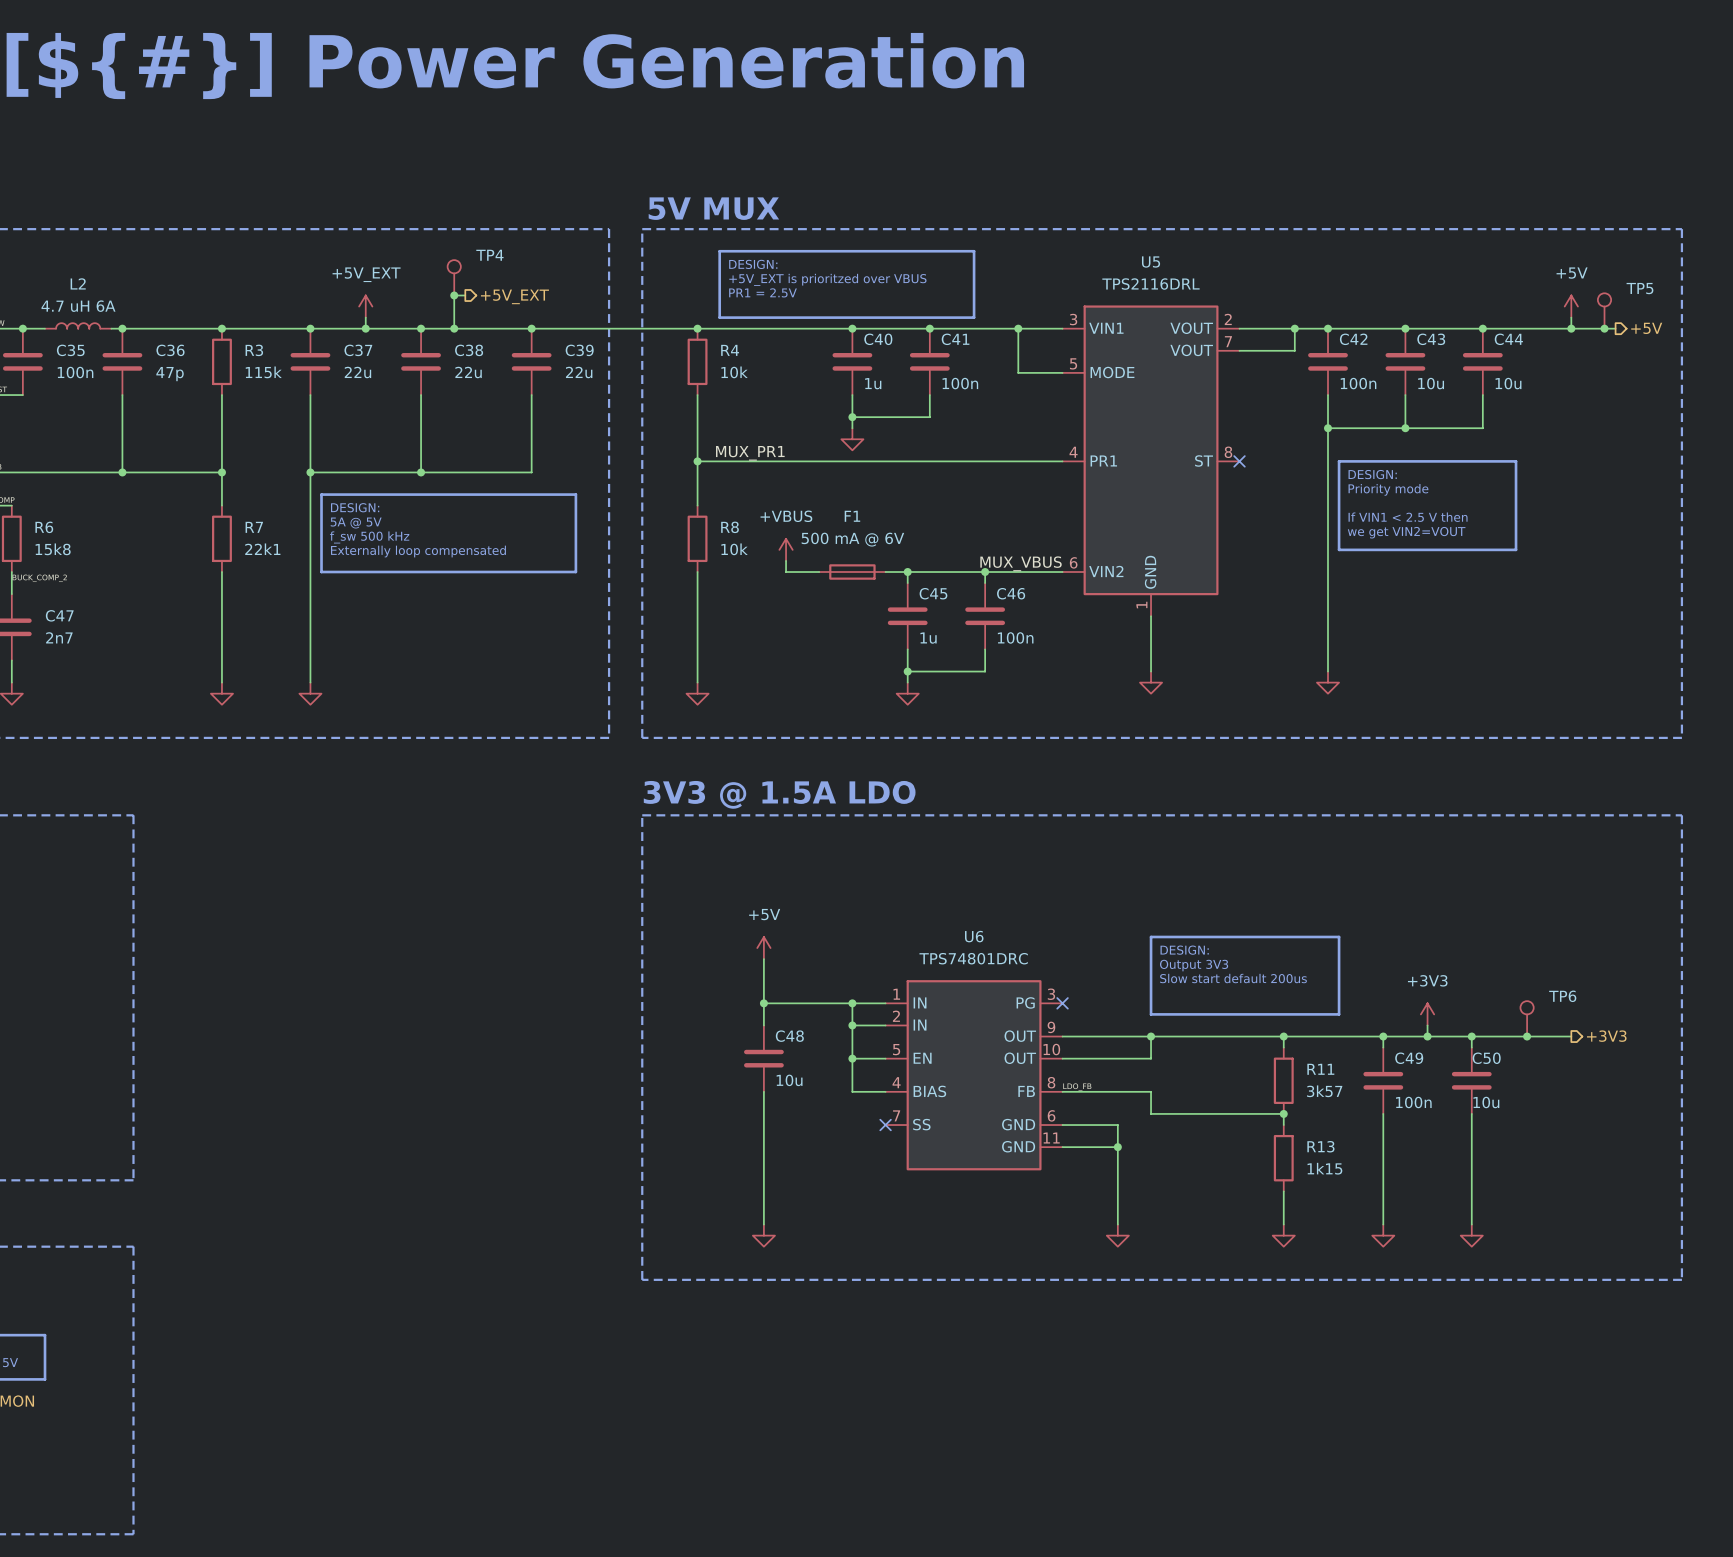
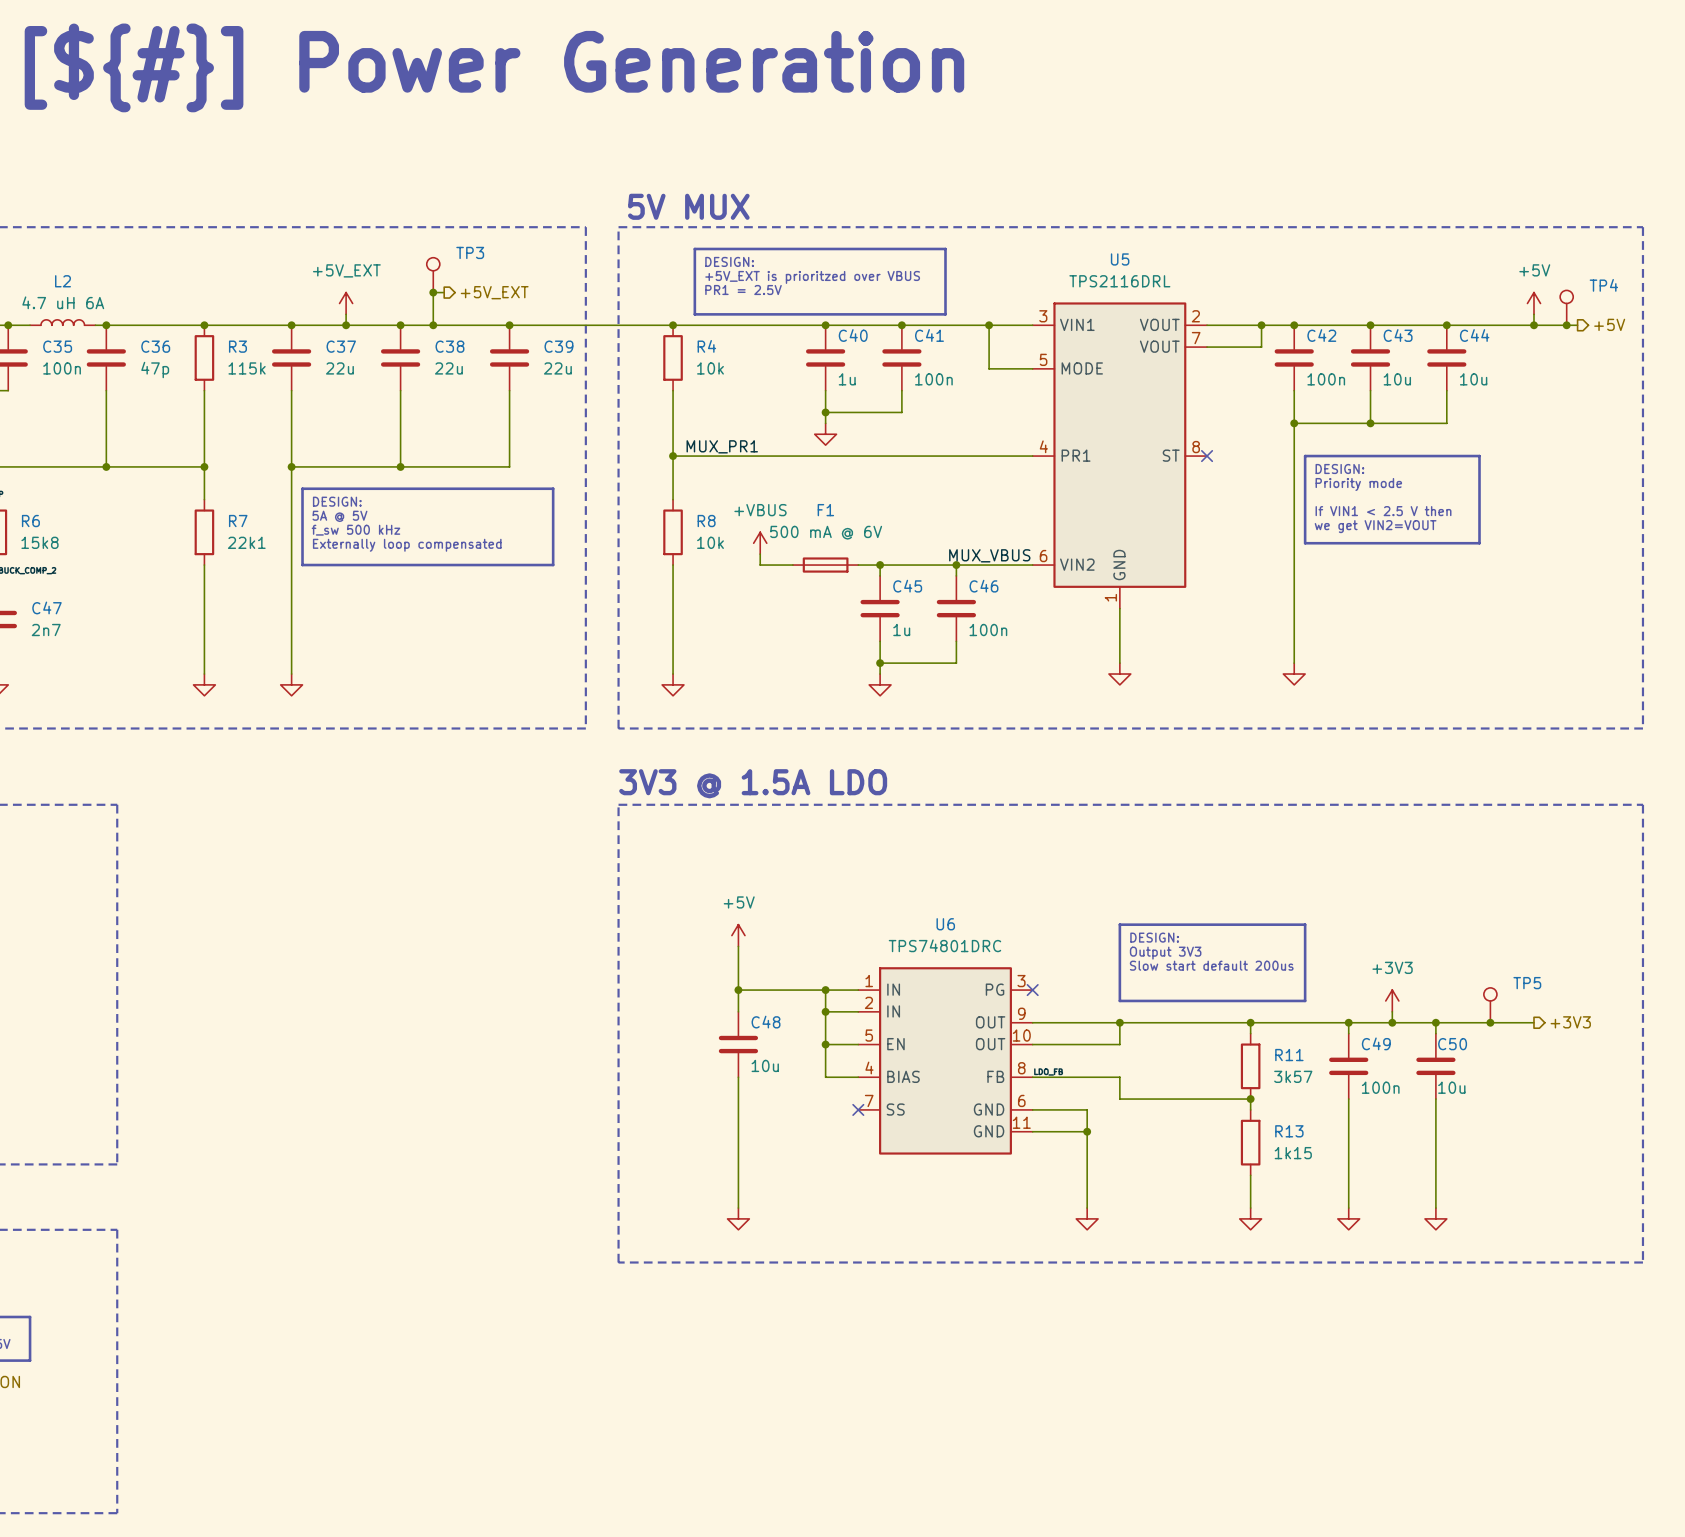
TP4 name: TP4 (489, 255) -> TP3 (470, 252)
TP5 name: TP5 (1639, 288) -> TP4 (1603, 285)
TP6 name: TP6 (1562, 996) -> TP5 (1527, 983)

